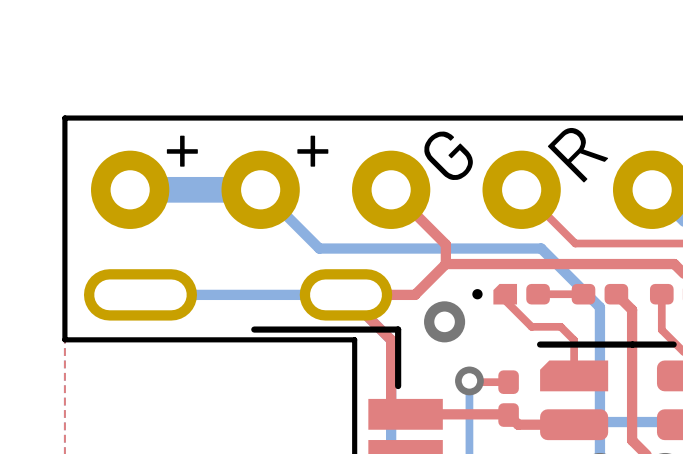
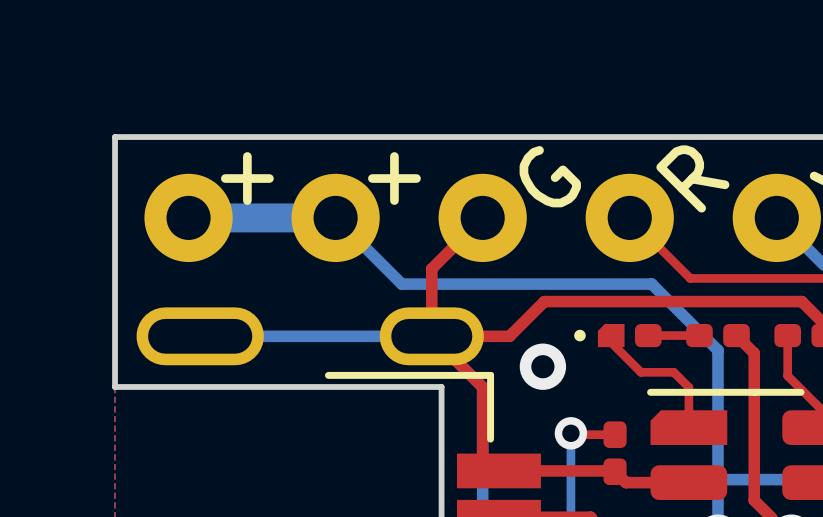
top track: (391, 189) (445, 244) (445, 264) -> (482, 217) (431, 268) (431, 336)

